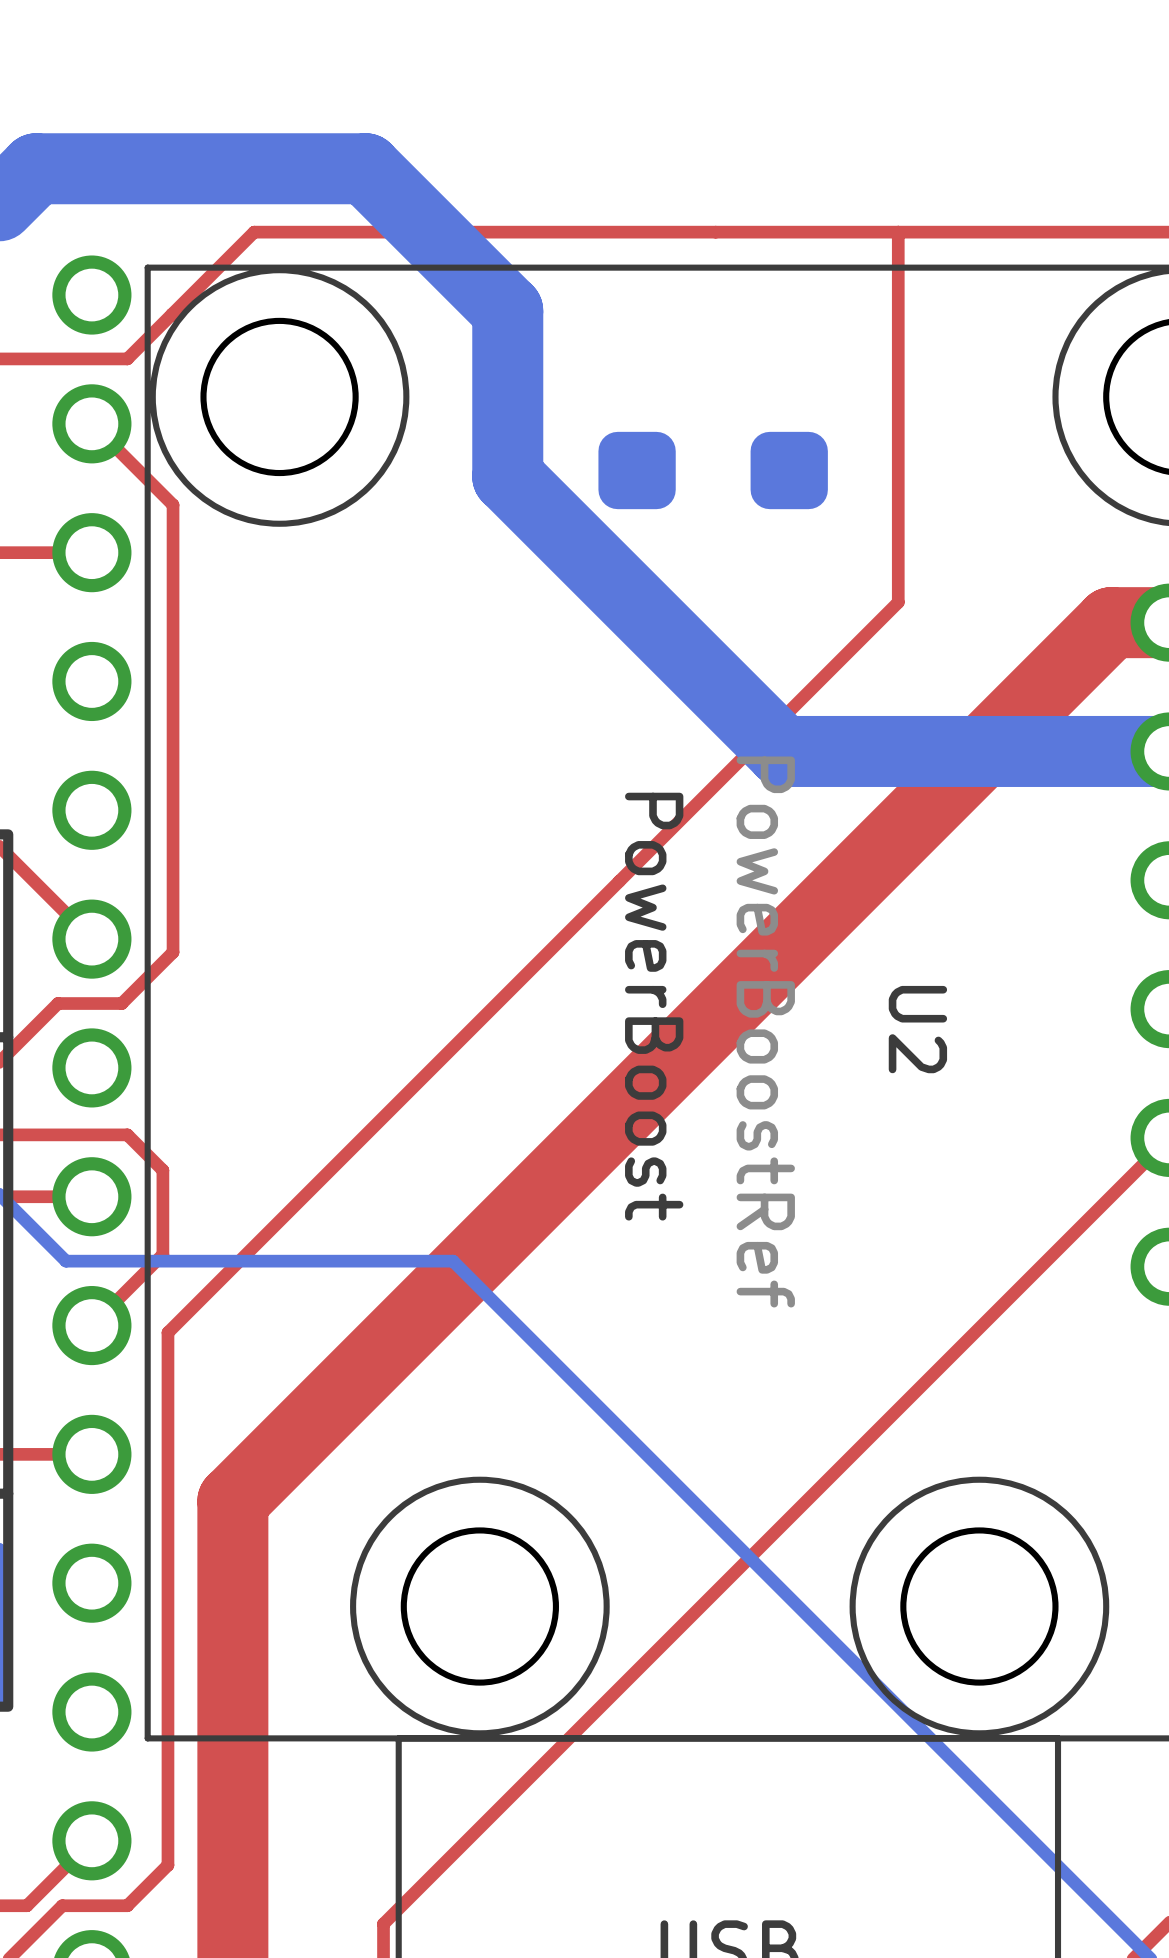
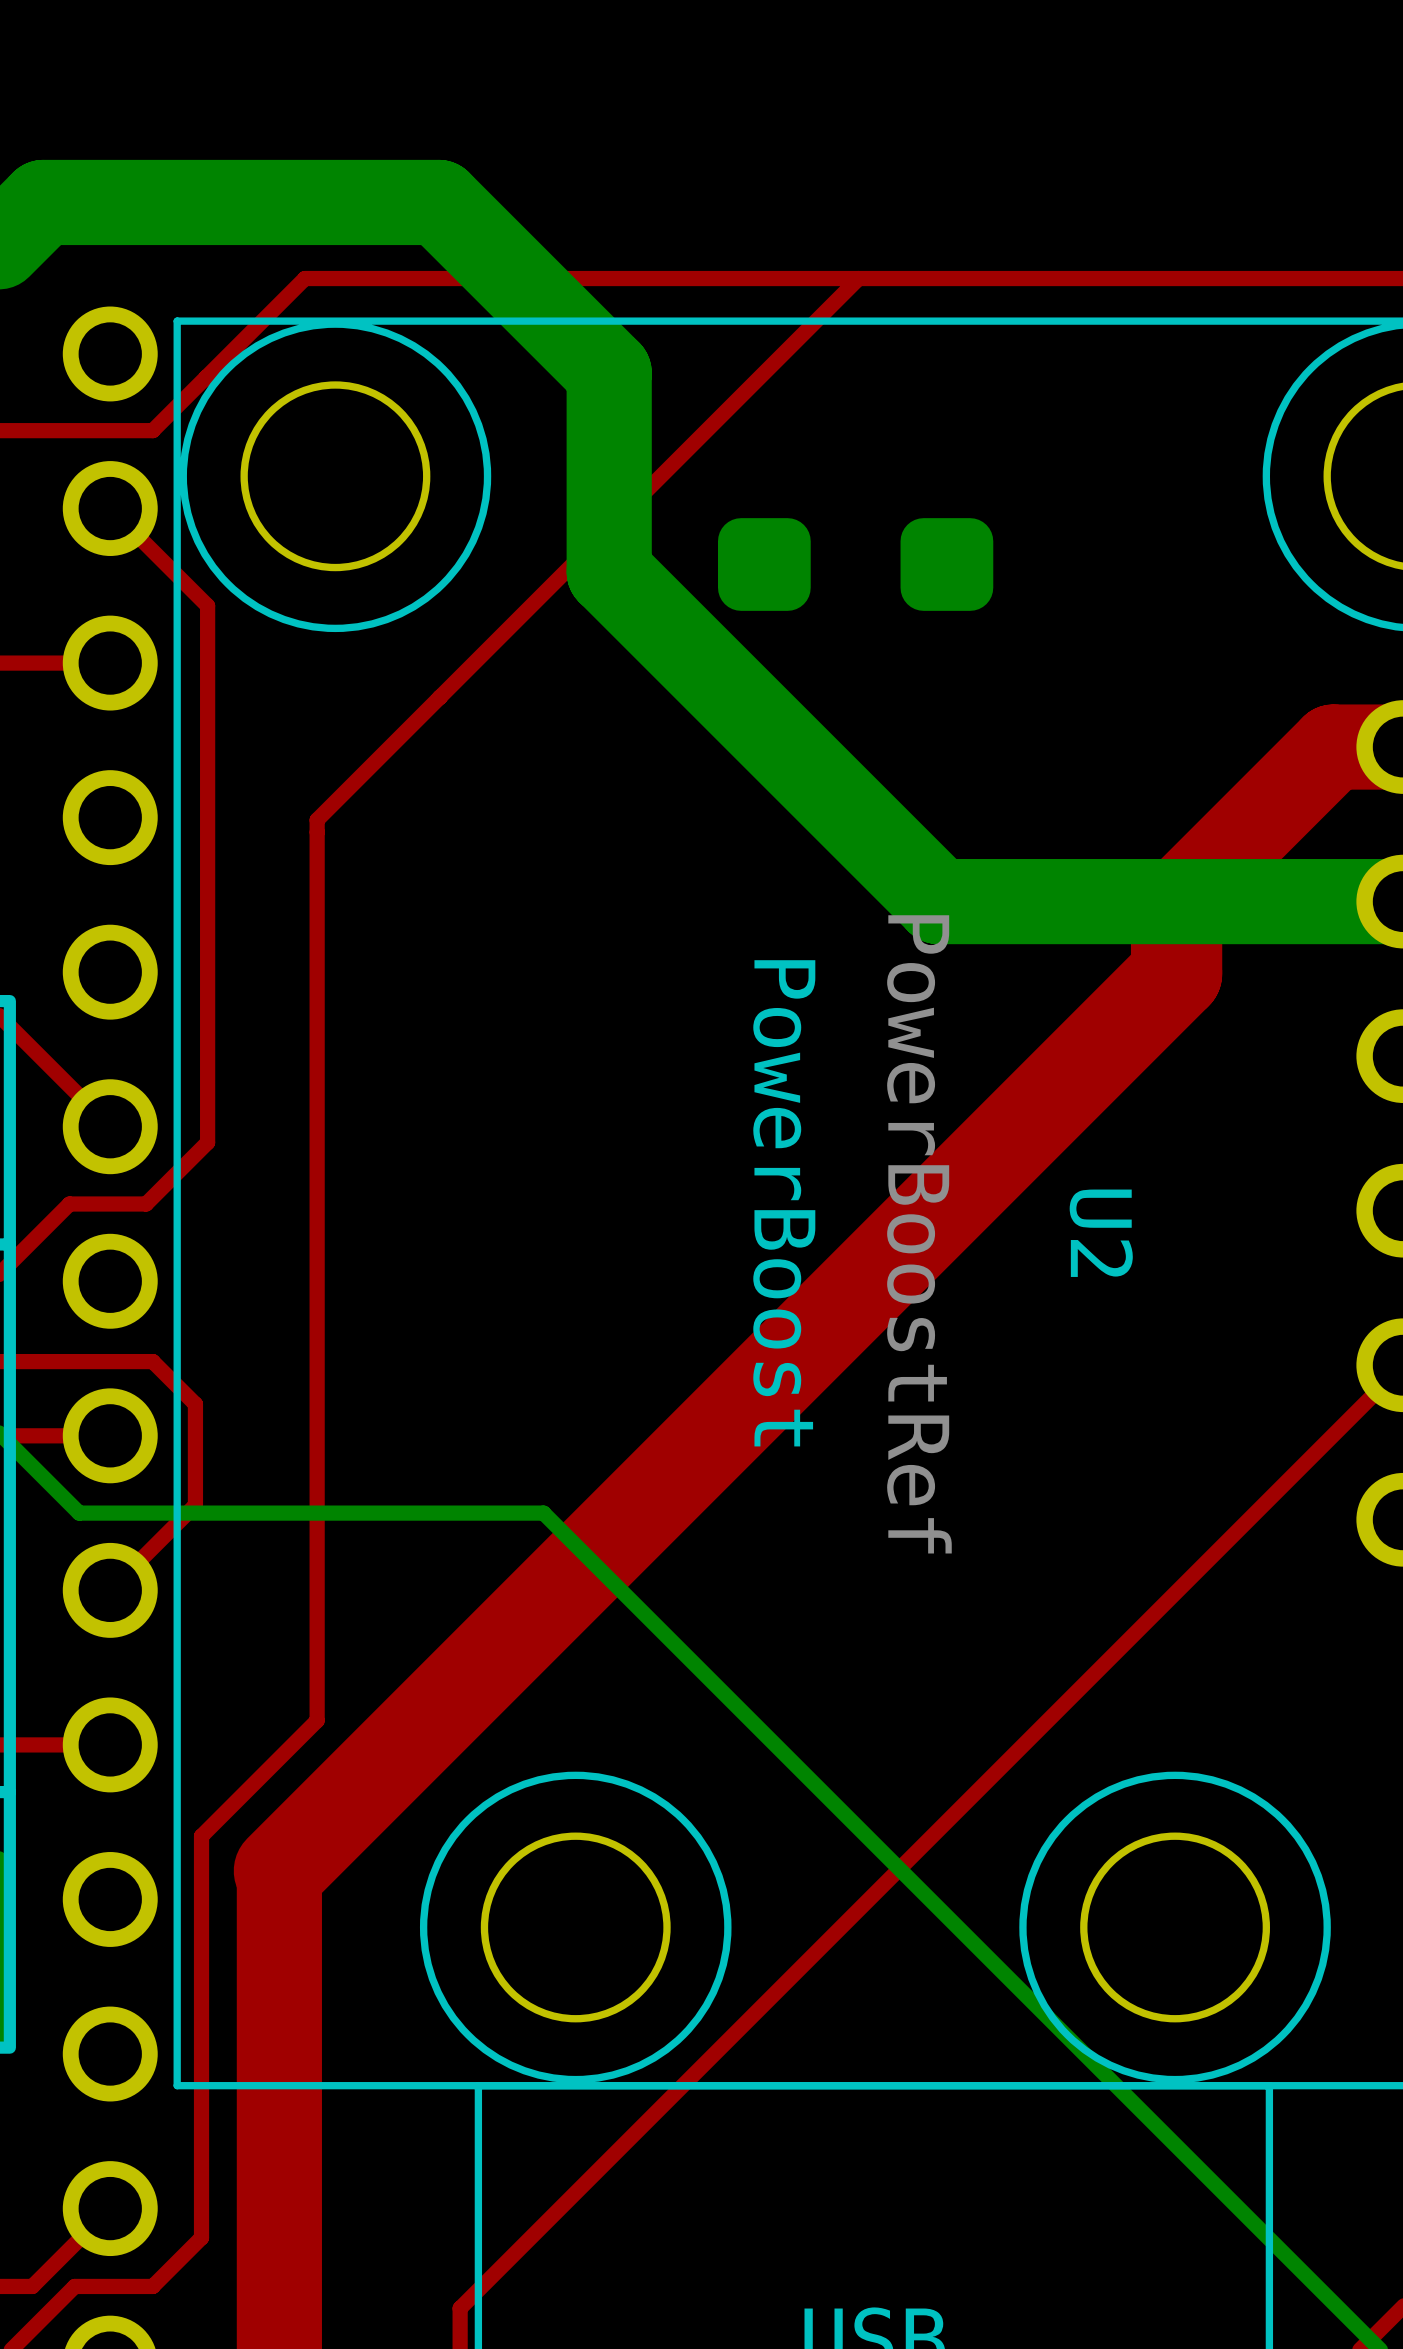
top track: (898, 232) (898, 602) (167, 1332) (167, 1530) -> (858, 278) (317, 820) (317, 1720) (201, 1836)
top track: (980, 753) (232, 1501) (232, 1559) -> (1176, 903) (1176, 973) (279, 1870)

